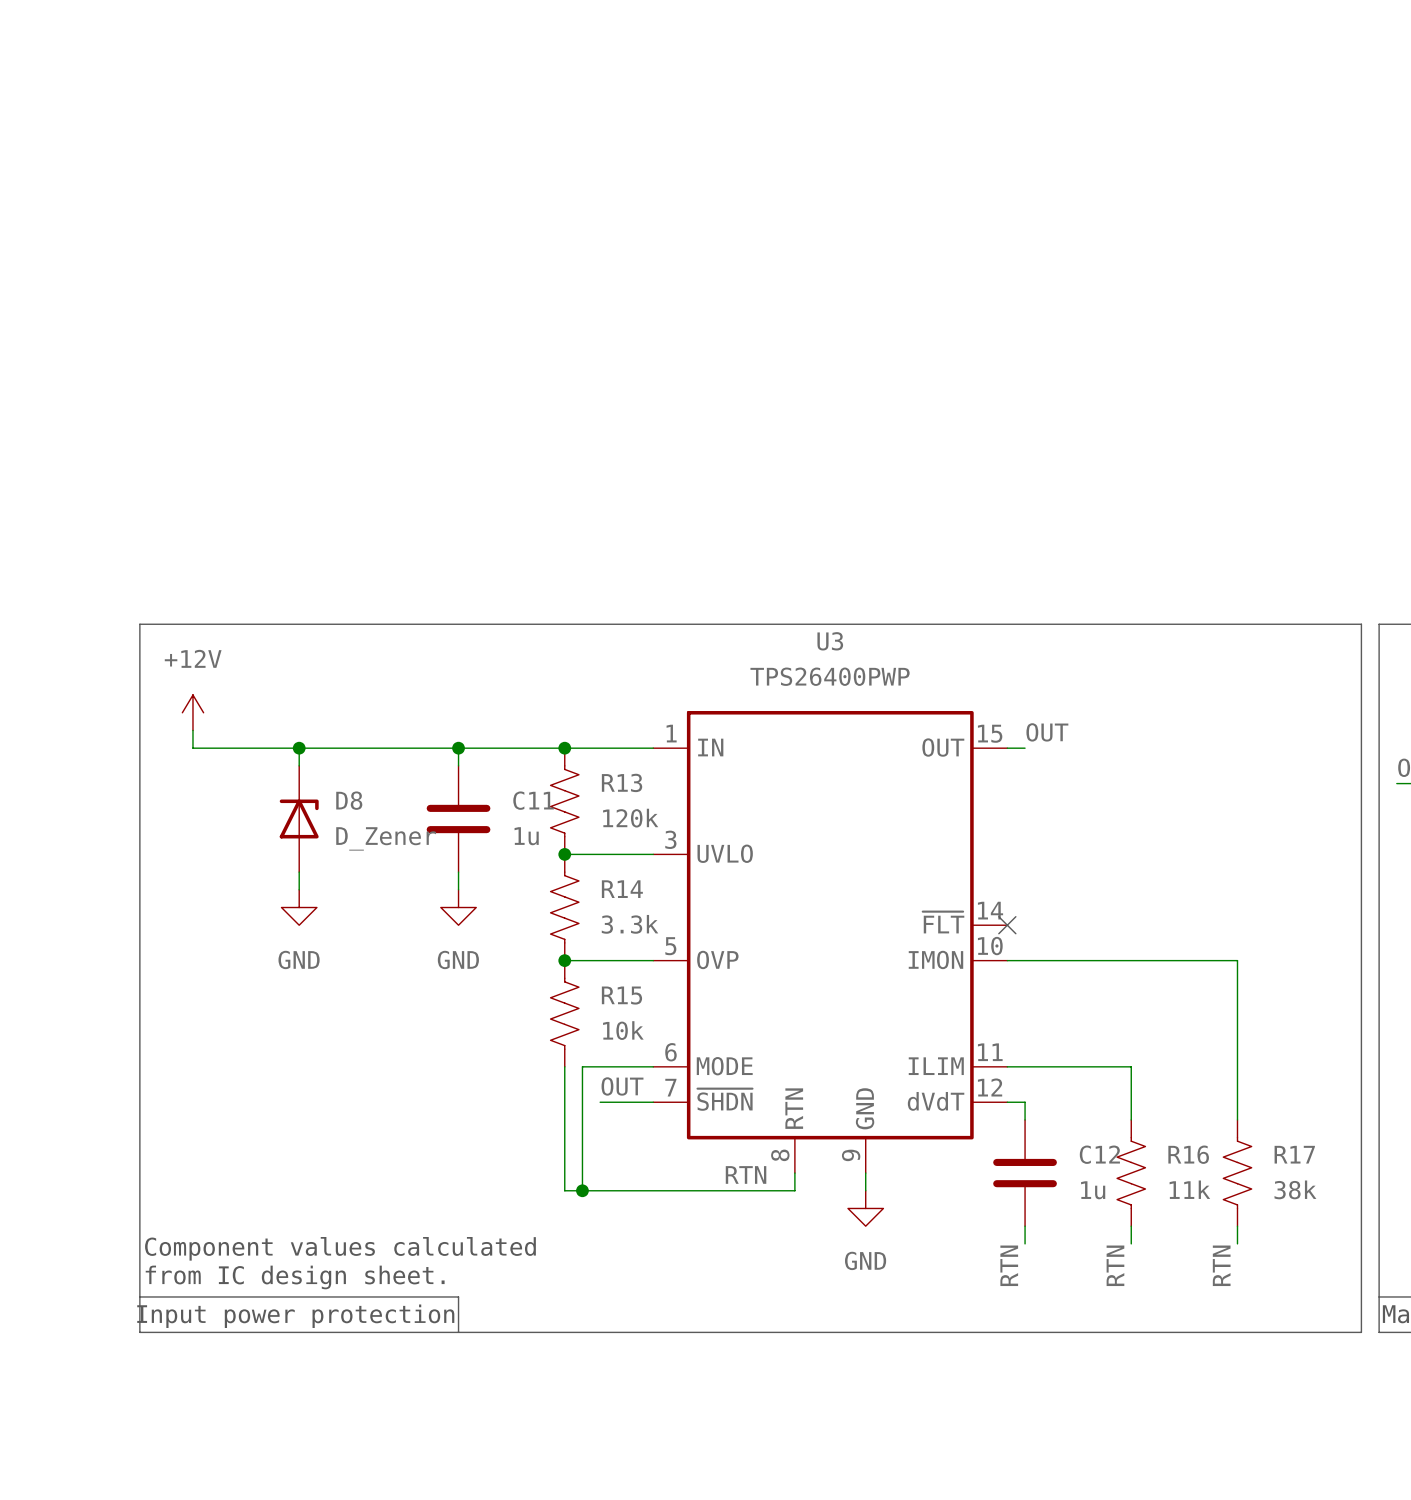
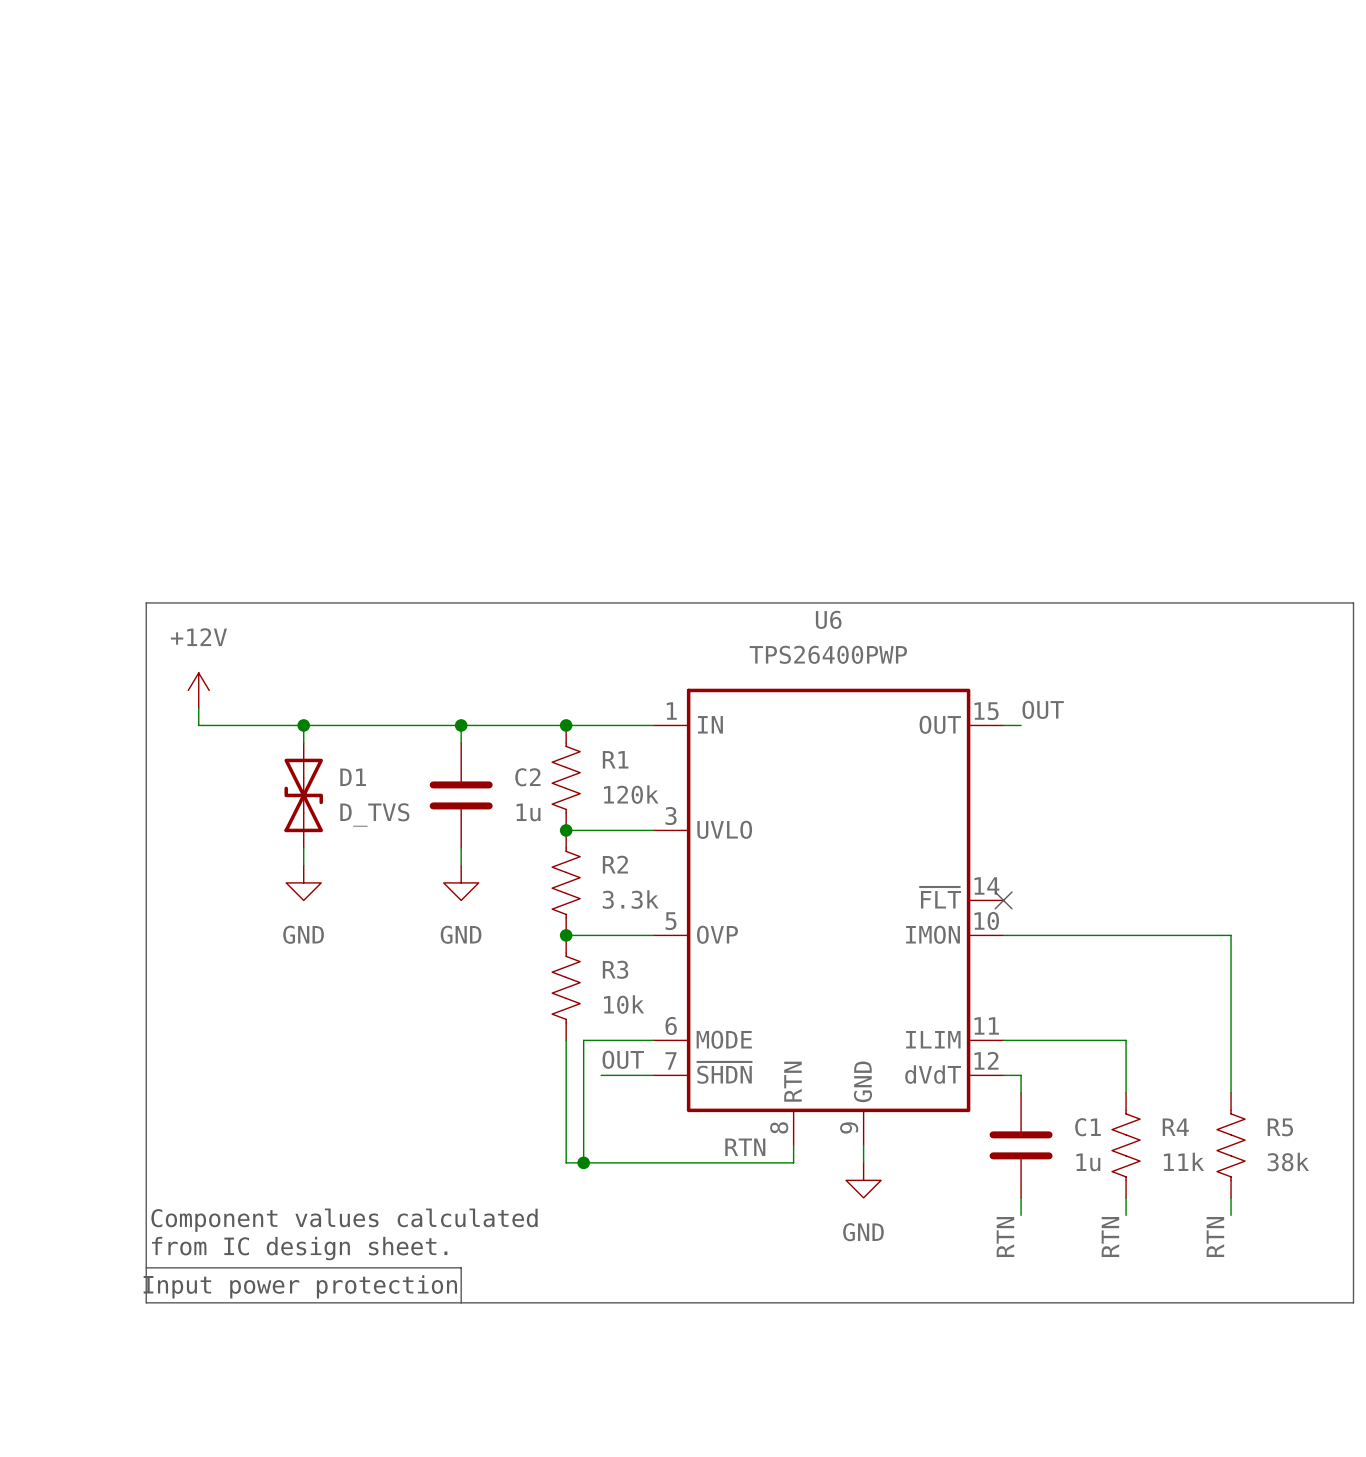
U3 name: U3 (830, 641) -> U6 (828, 619)
R13 name: R13 (622, 782) -> R1 (615, 759)
C11 name: C11 (533, 800) -> C2 (527, 777)
D8: D_Zener (299, 818) -> none
D1: none -> D_TVS (303, 795)
R14 name: R14 (622, 889) -> R2 (615, 864)
R15 name: R15 (621, 995) -> R3 (615, 969)
C12 name: C12 (1099, 1154) -> C1 (1088, 1127)
R16 name: R16 (1188, 1154) -> R4 (1175, 1127)
R17 name: R17 (1294, 1154) -> R5 (1280, 1127)

